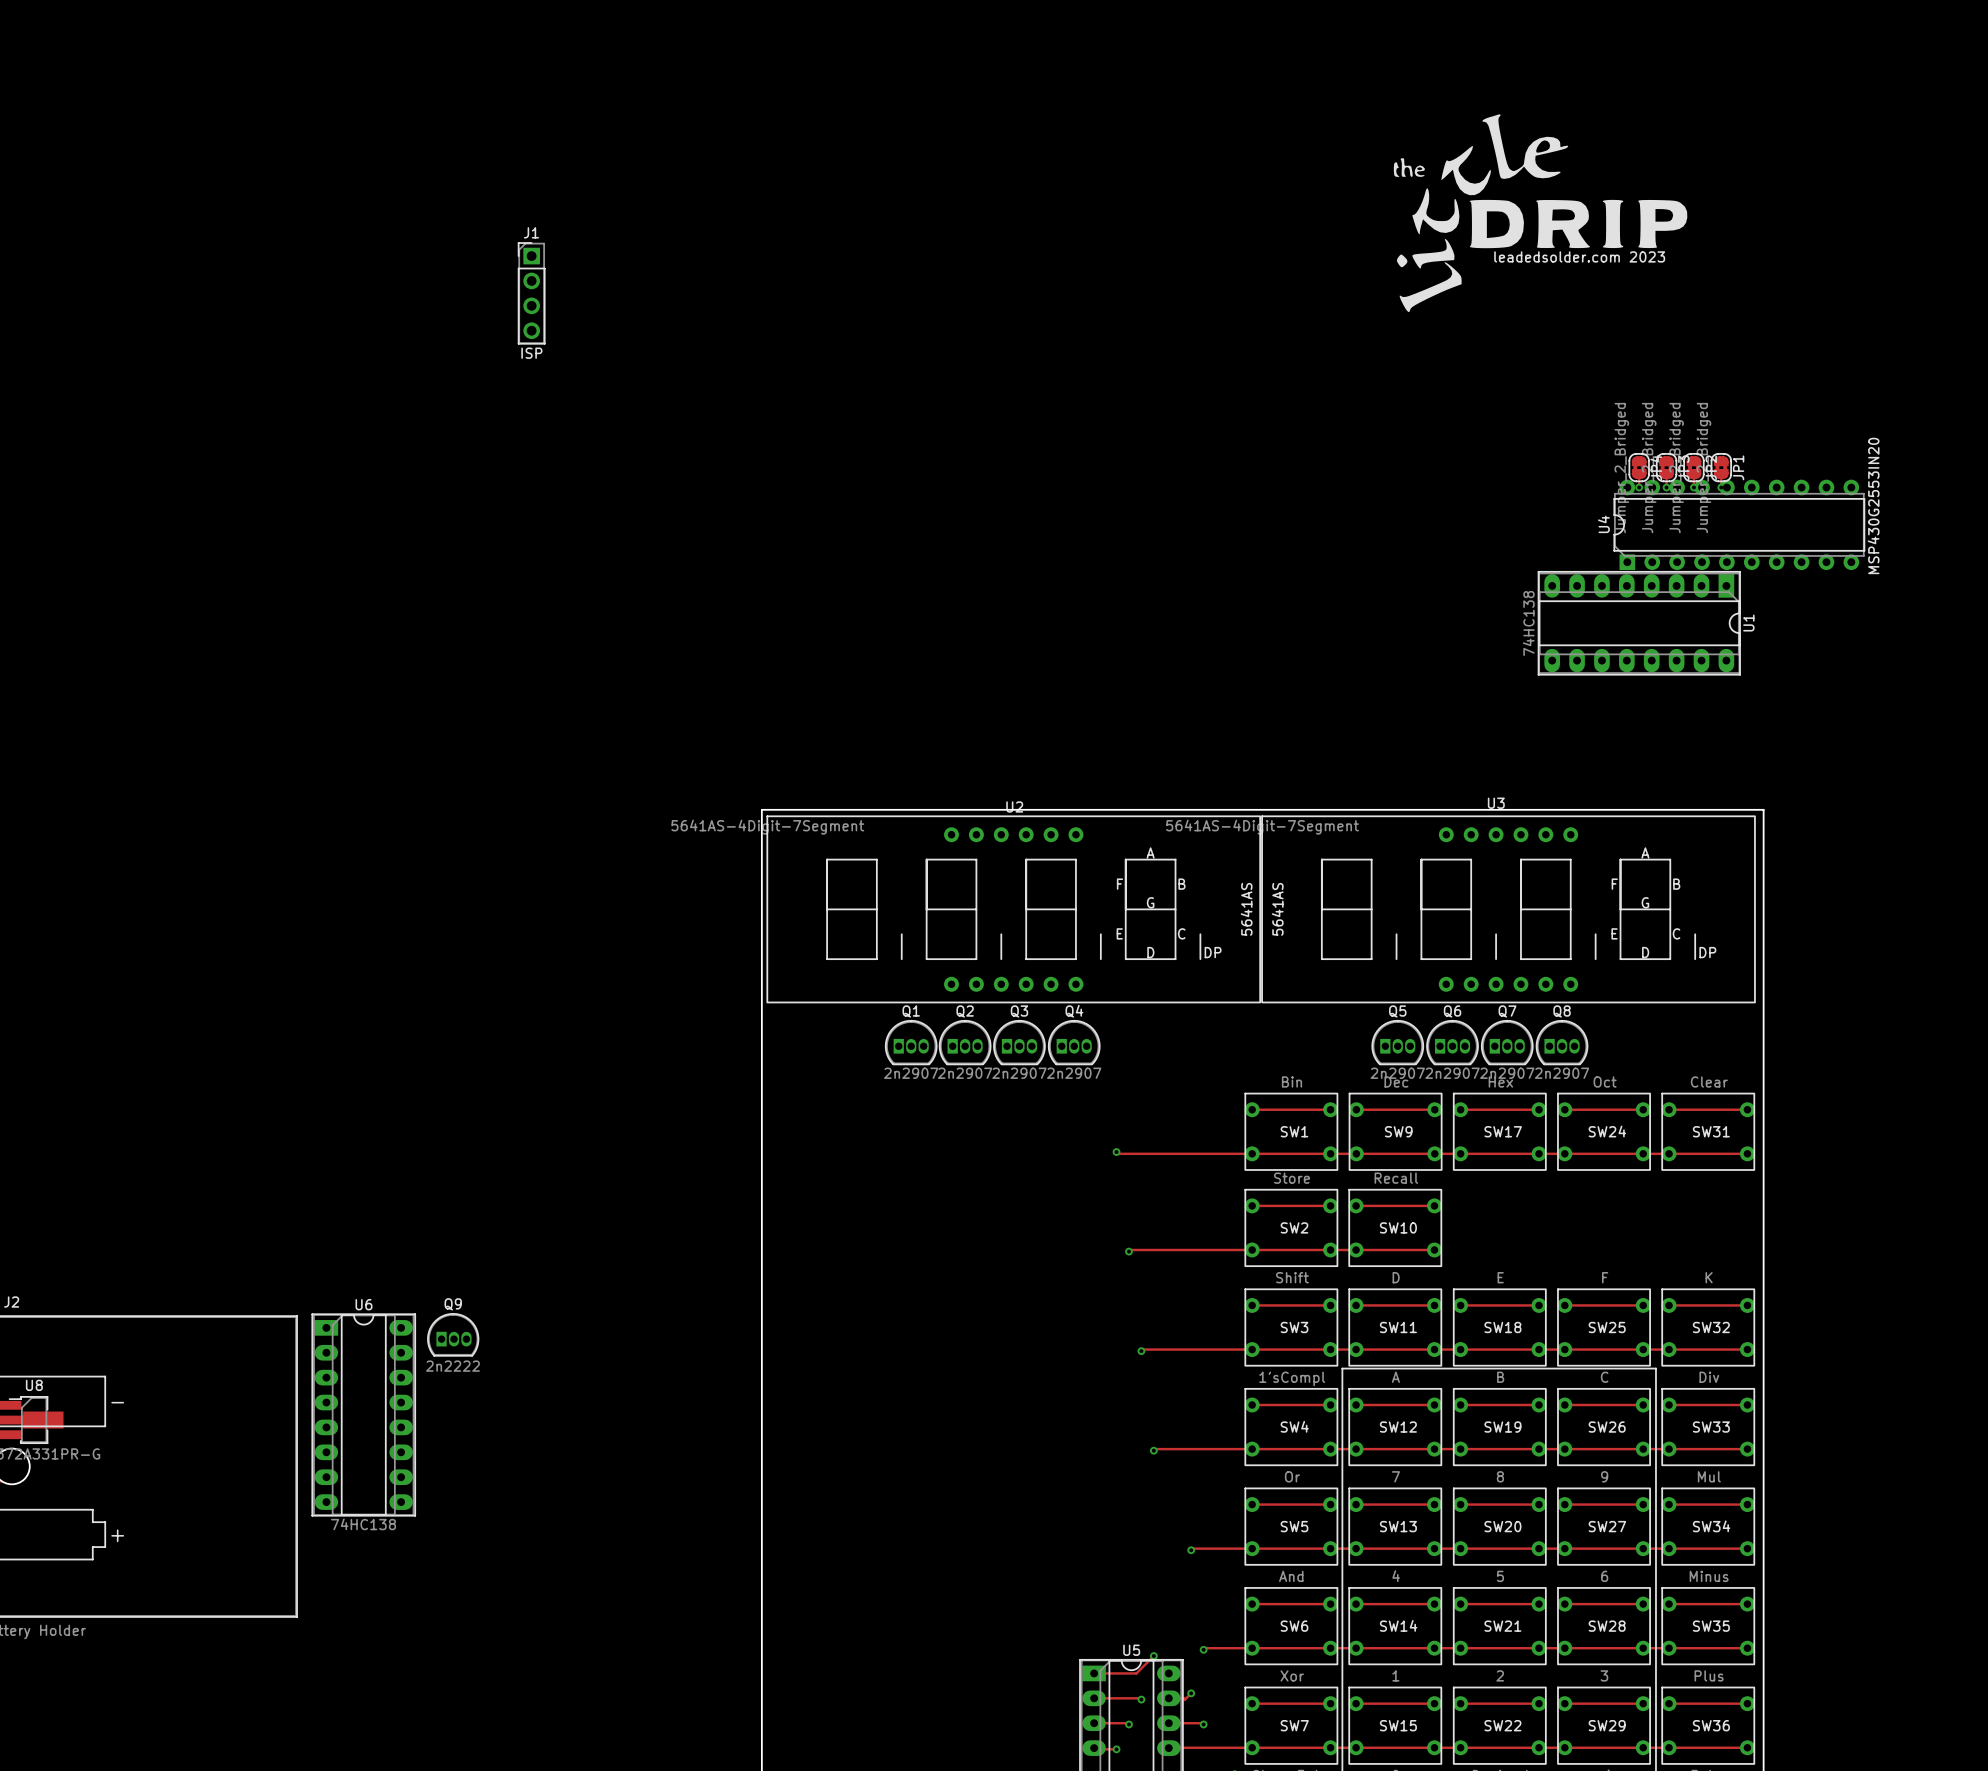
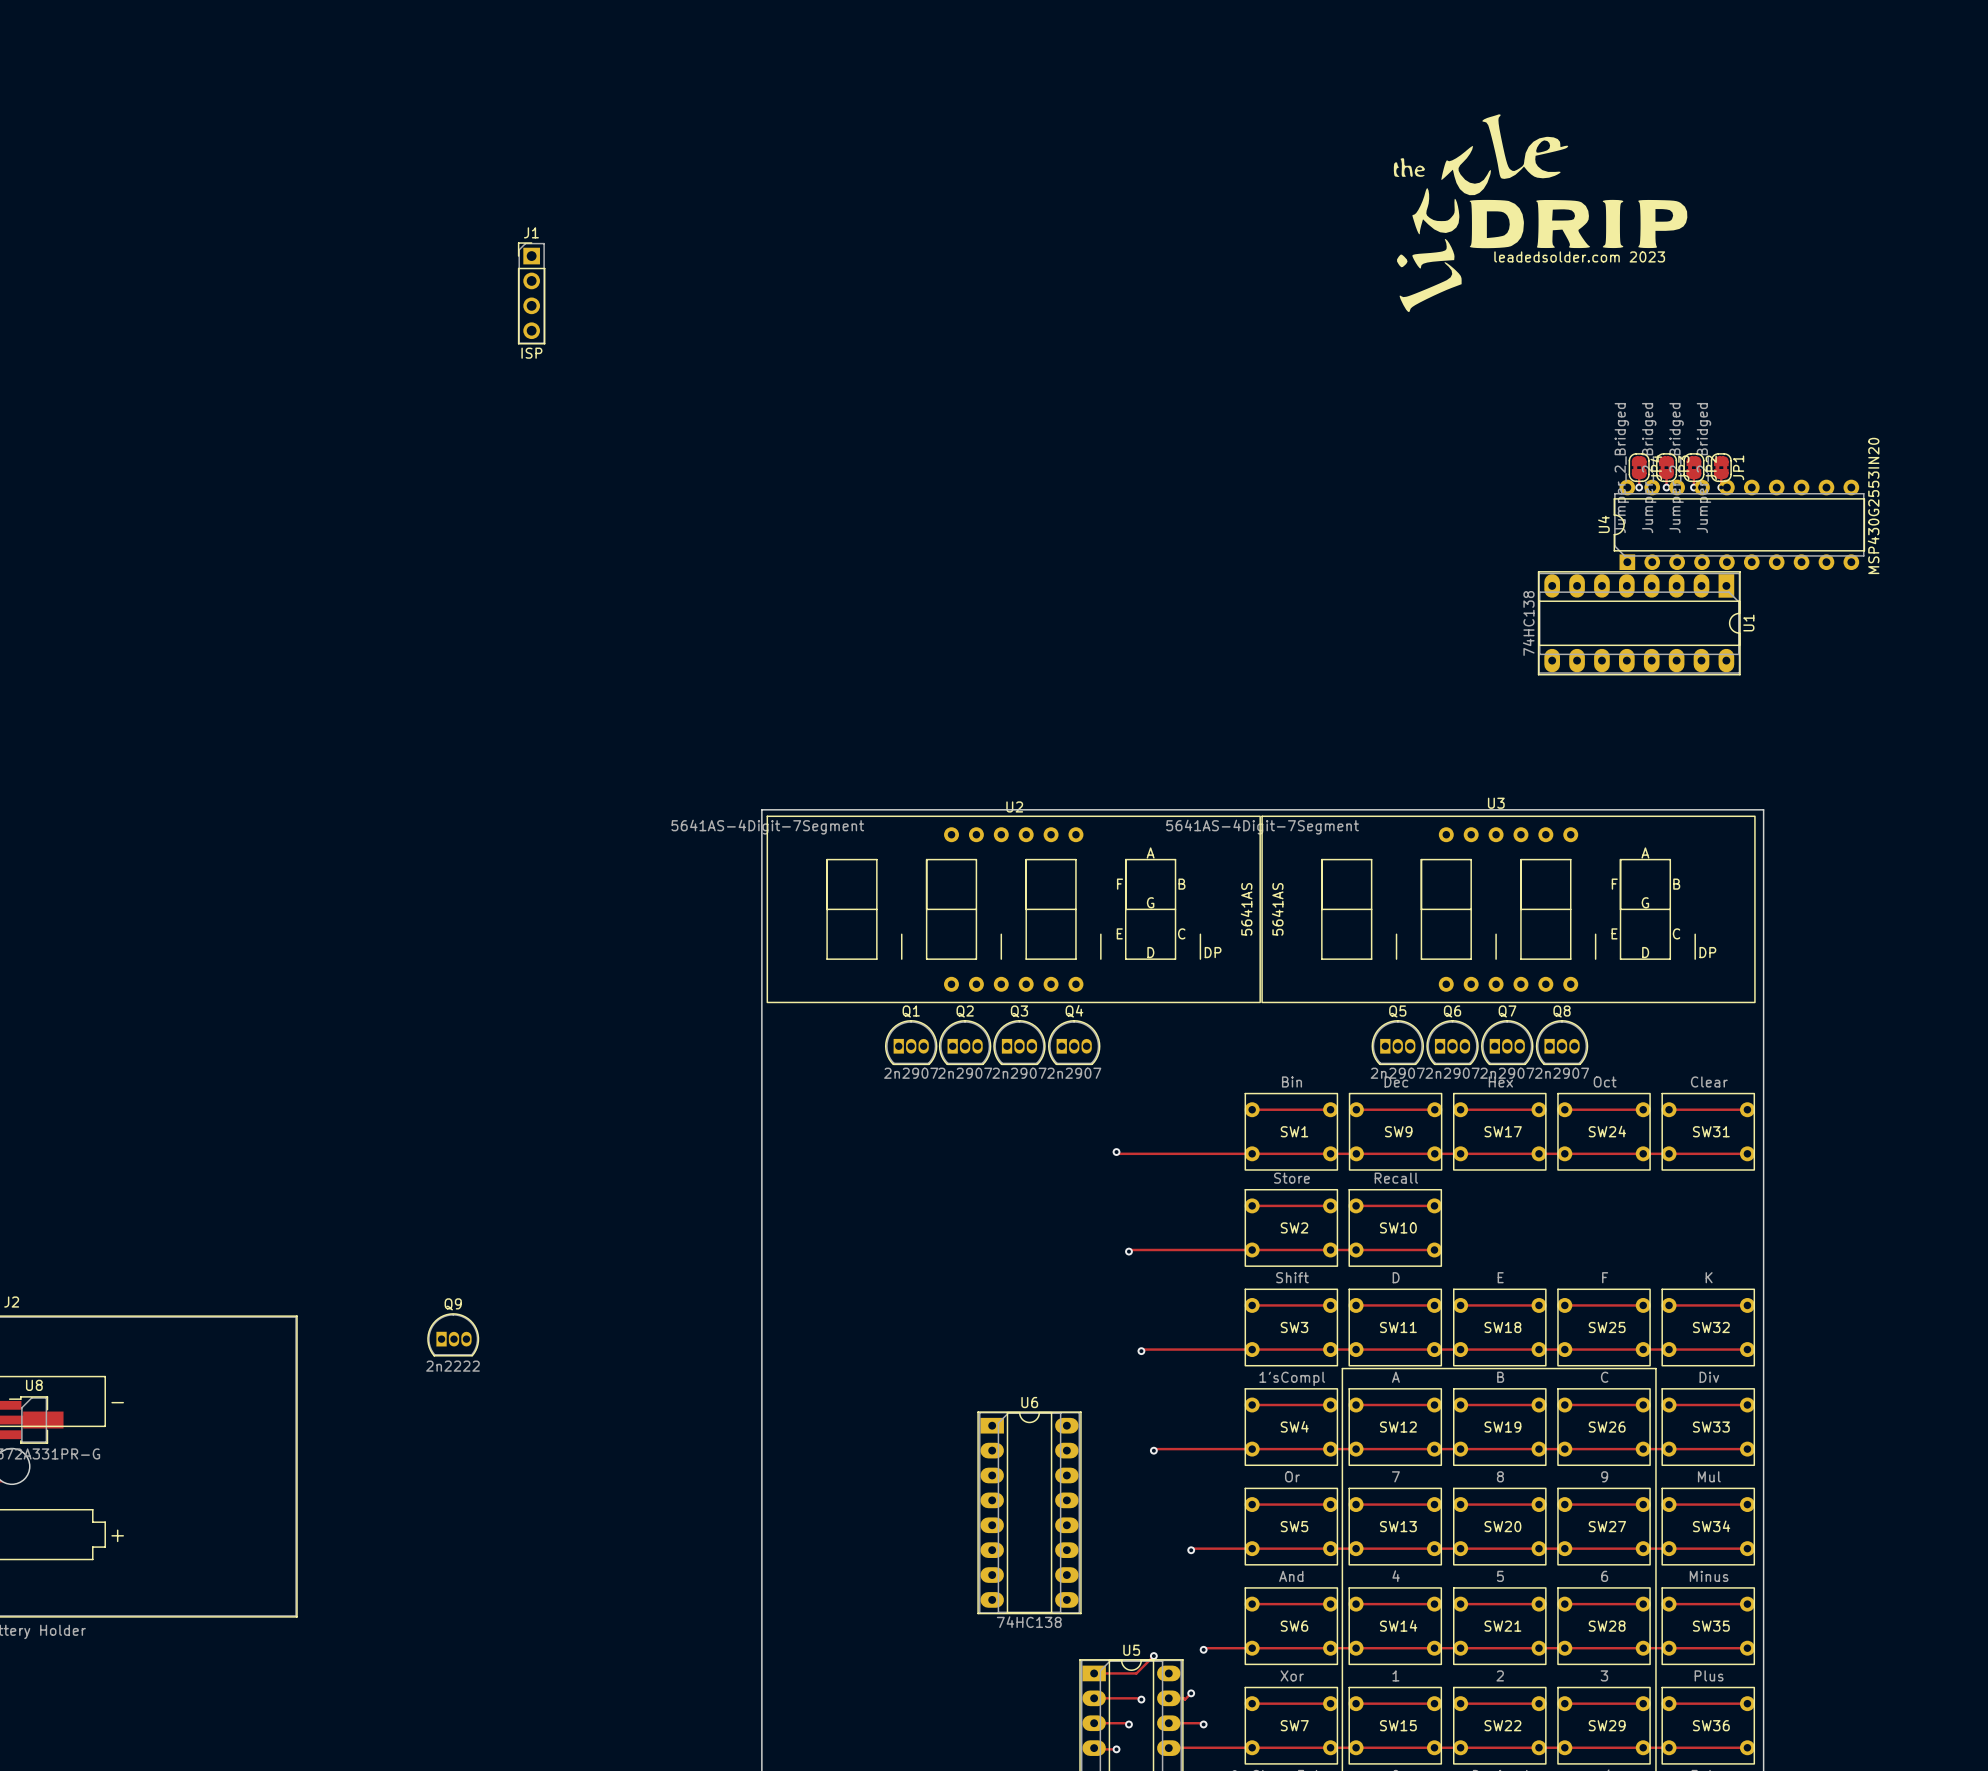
U6 position: (363, 1414) -> (1029, 1512)

